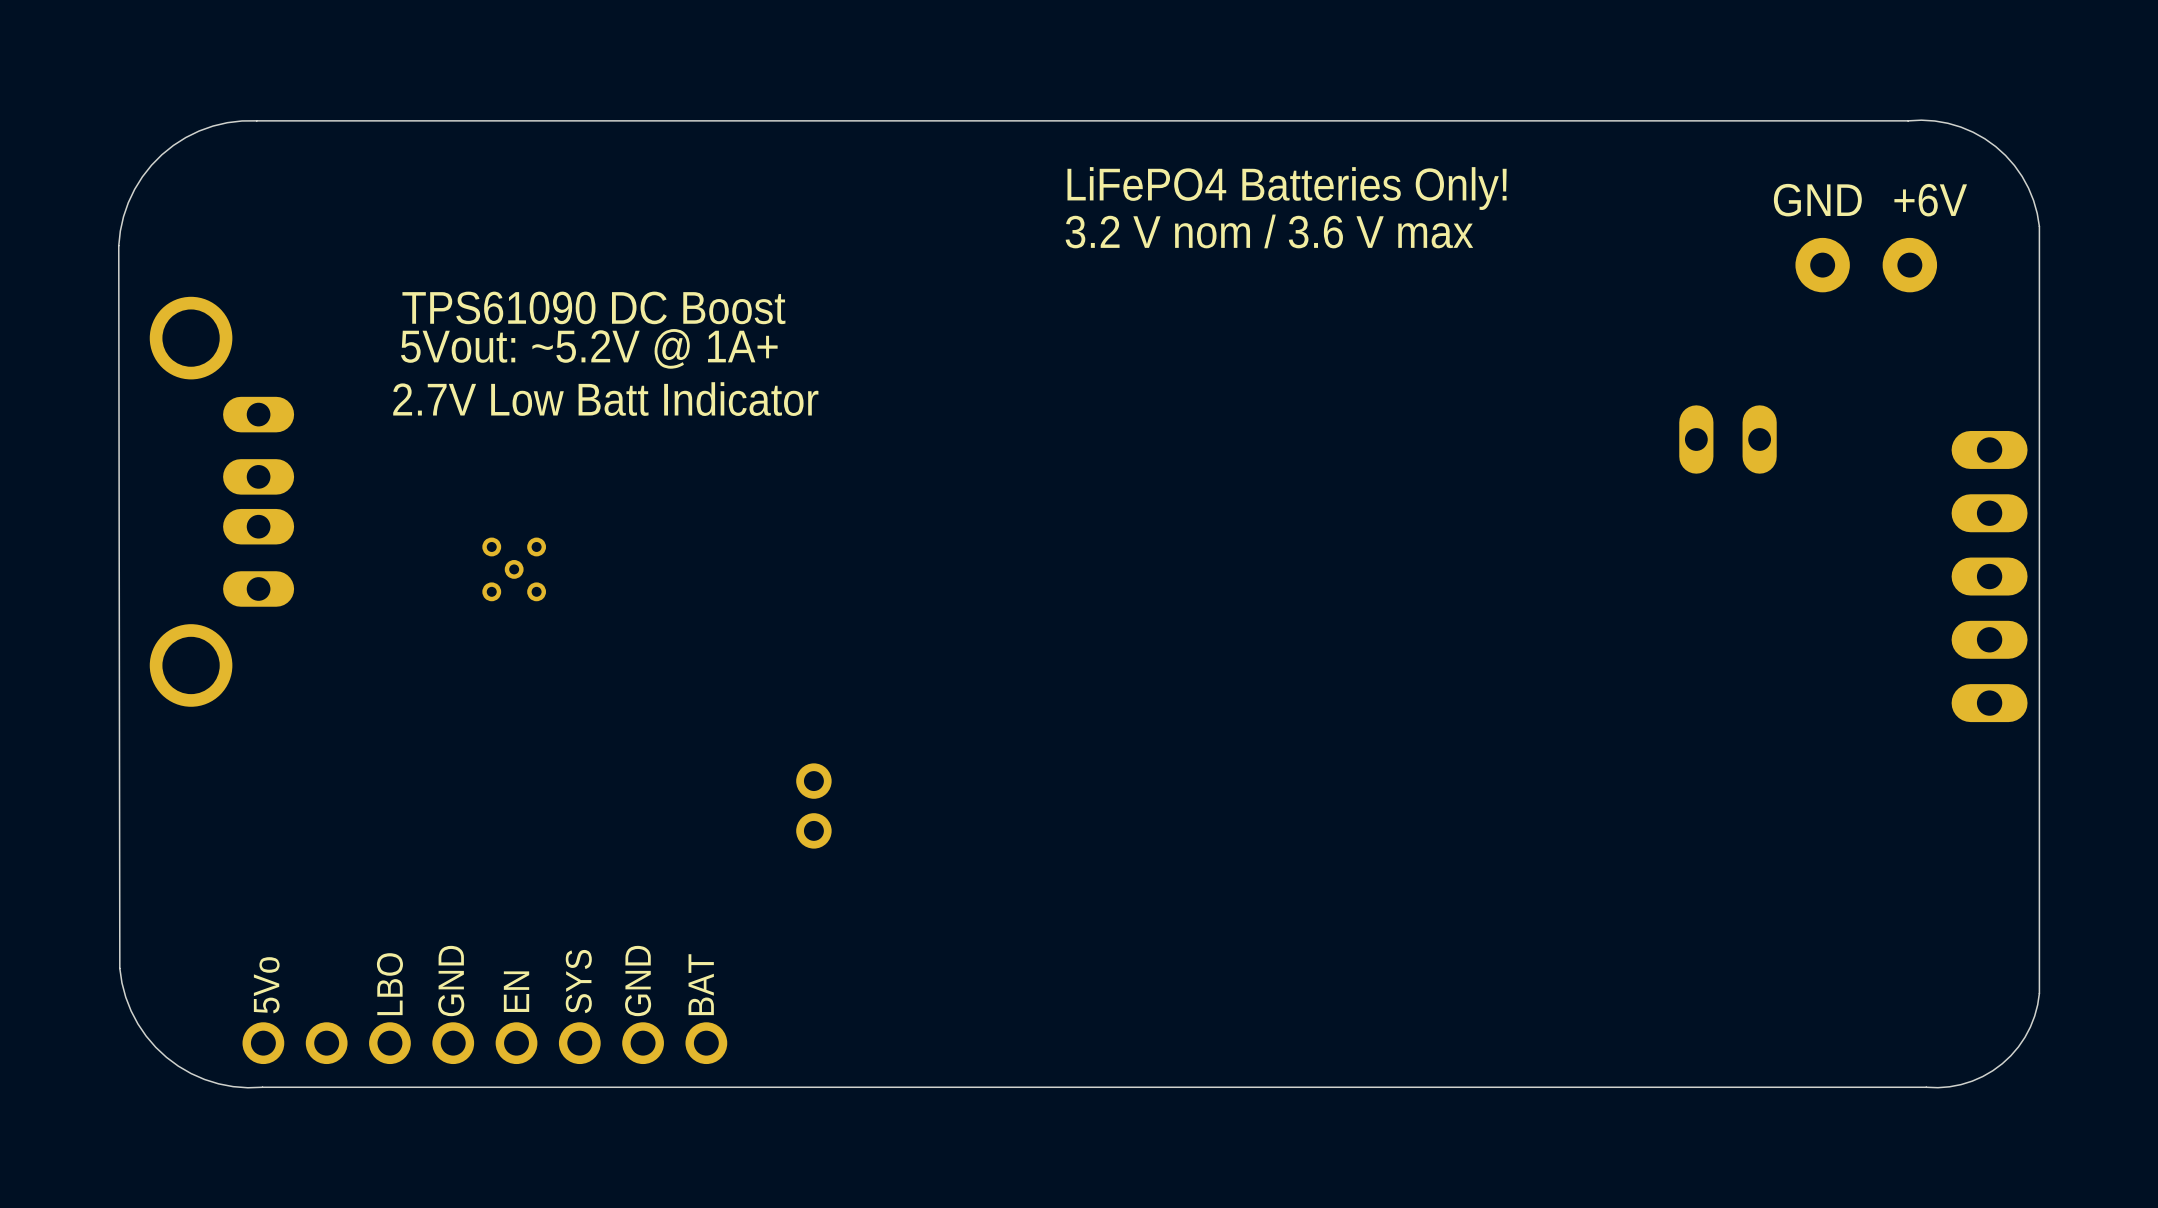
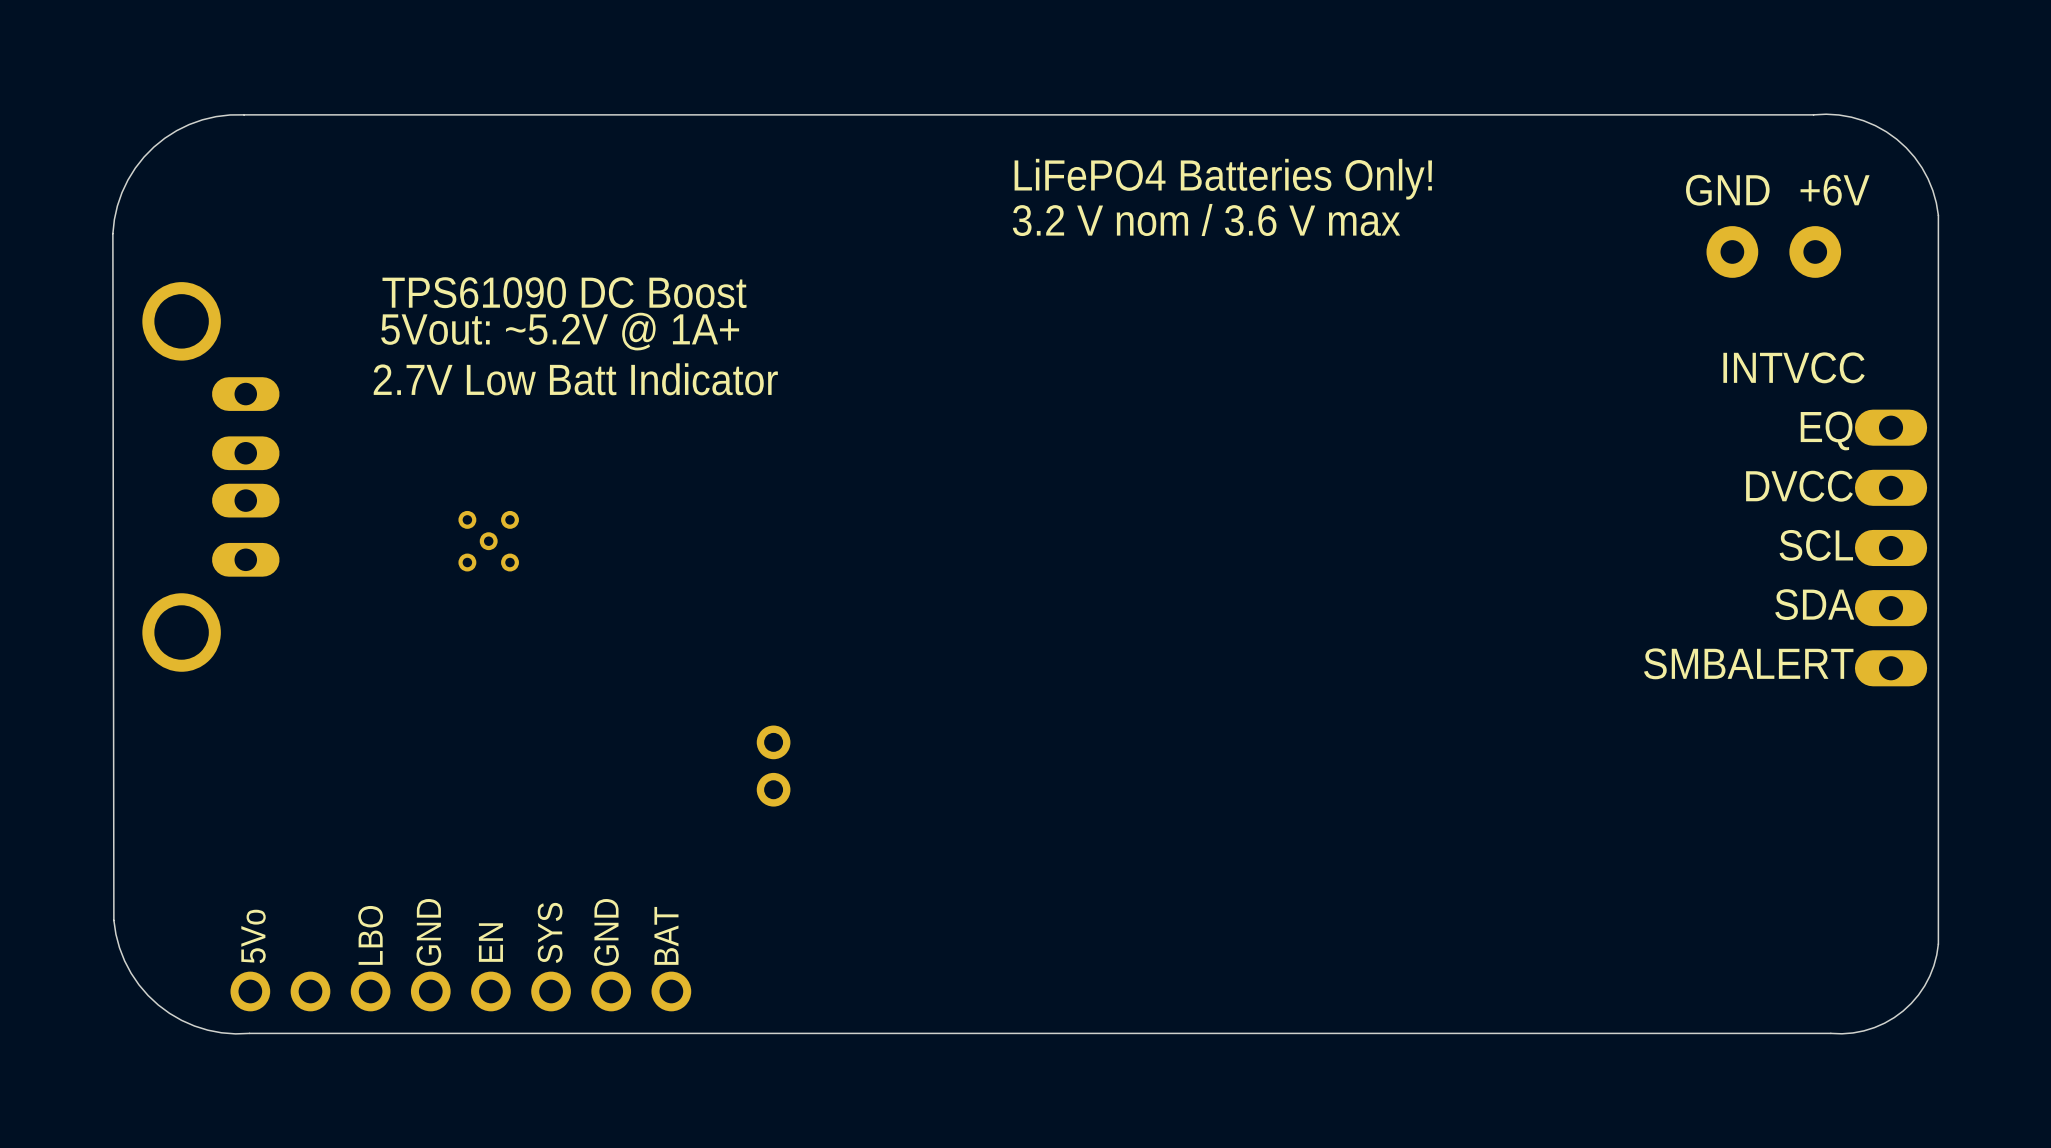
text: none -> INTVCC (1794, 367)
part: (1727, 439) -> none
text: none -> EQ (1826, 430)
text: none -> DVCC (1799, 486)
text: none -> SCL (1816, 545)
text: none -> SDA (1814, 604)
text: none -> SMBALERT (1748, 663)

